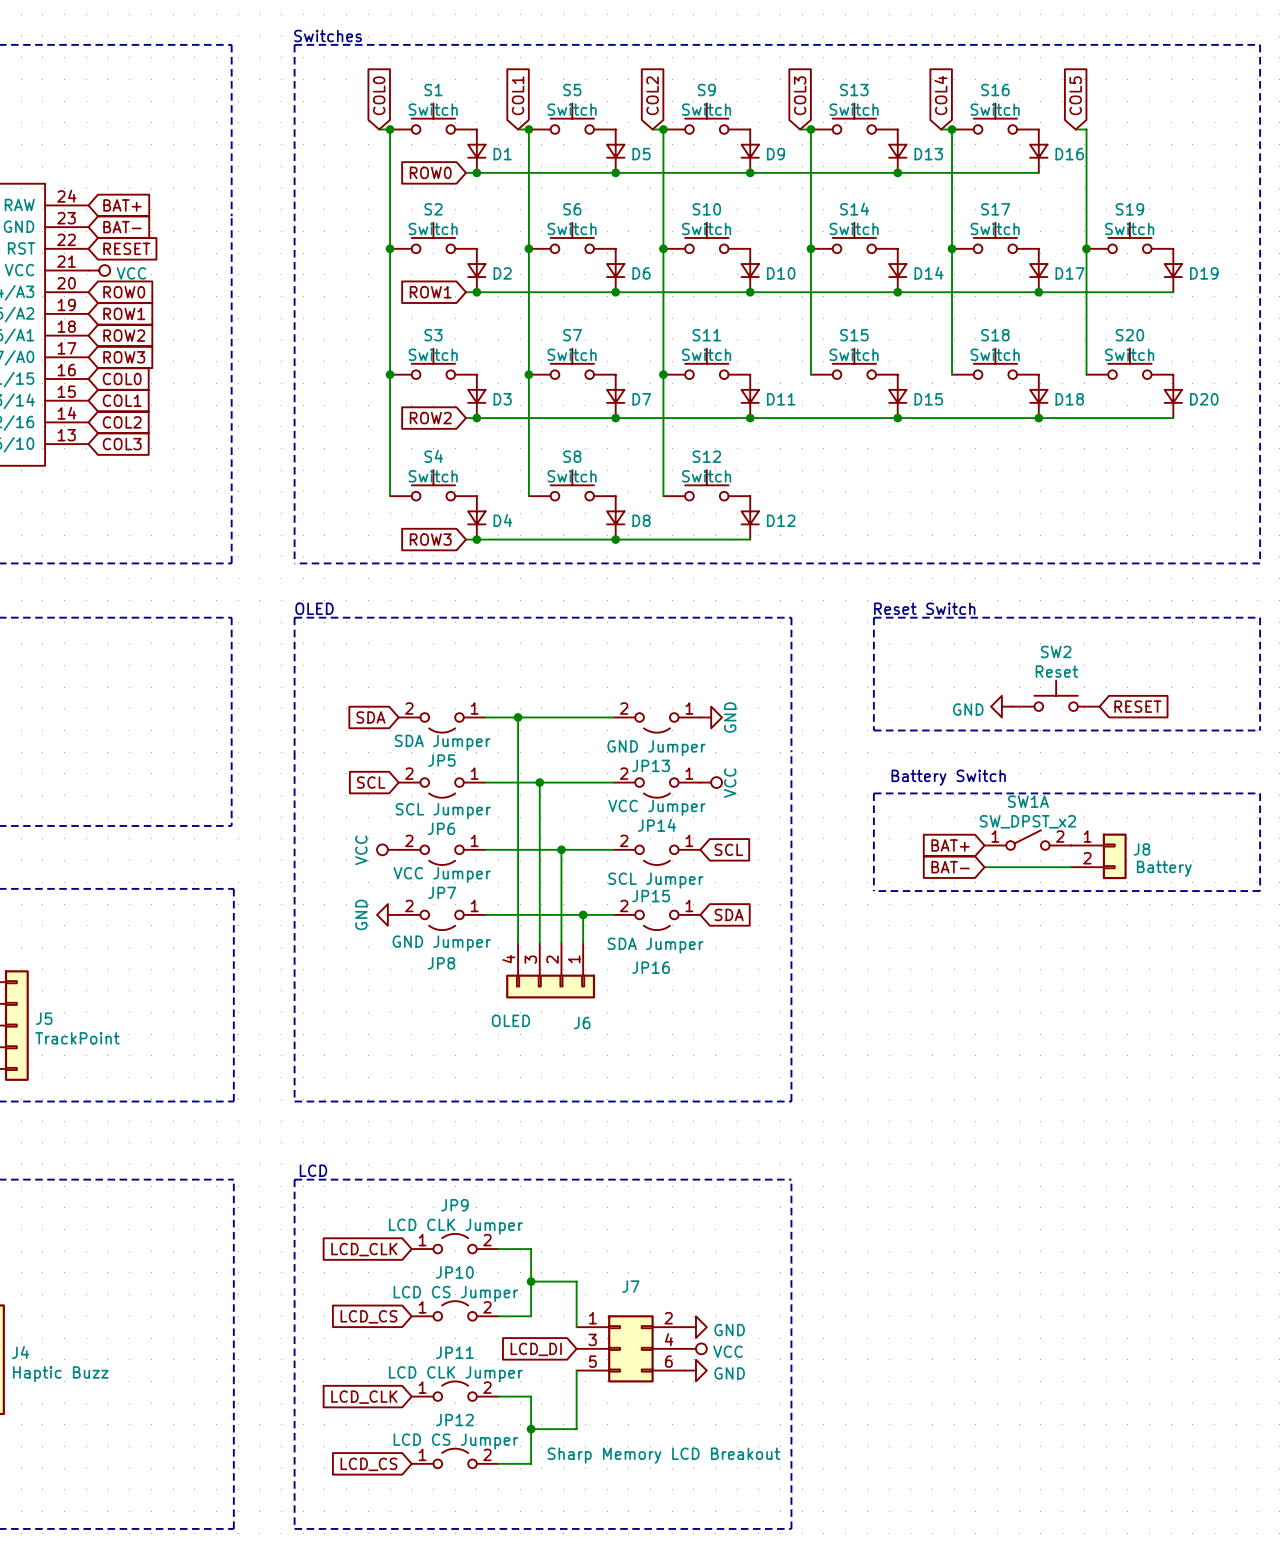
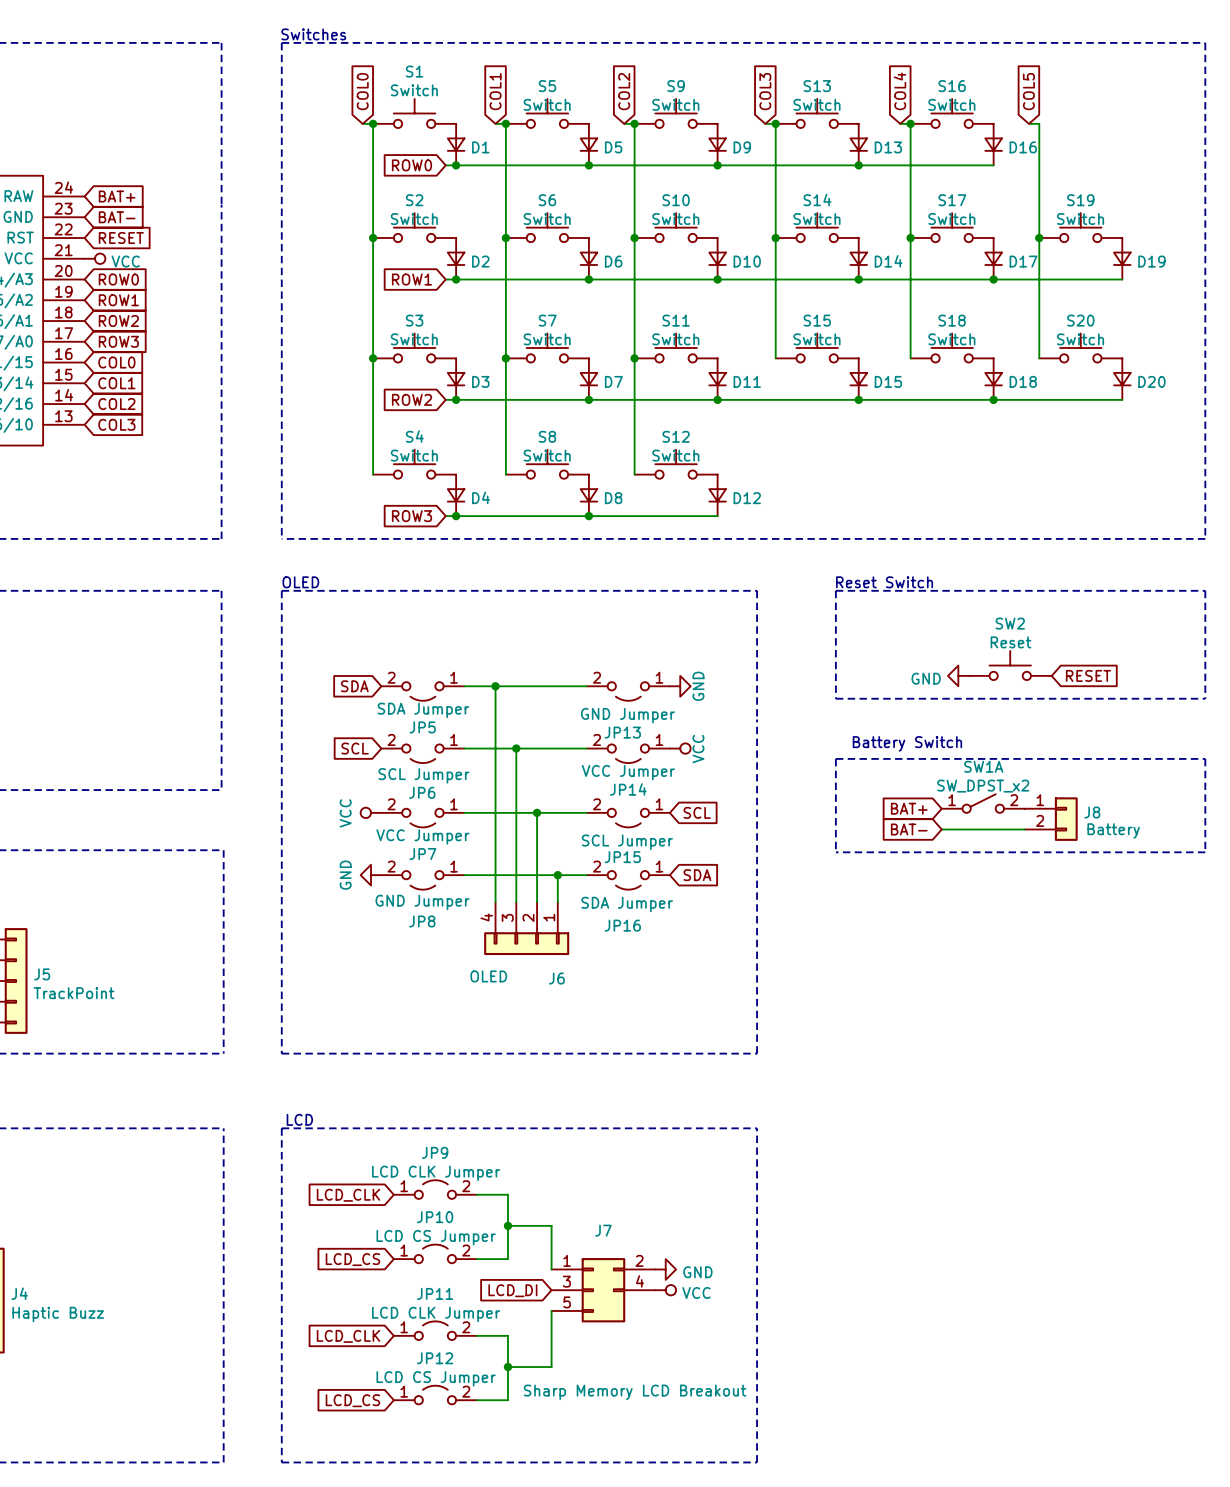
S1 name position: S1 (433, 90) -> S1 (414, 71)
S1 value position: Switch (433, 109) -> Switch (414, 90)
J7 symbol: [576, 1315, 686, 1383] -> [551, 1258, 656, 1323]
power symbol: GND (695, 1370) -> none

